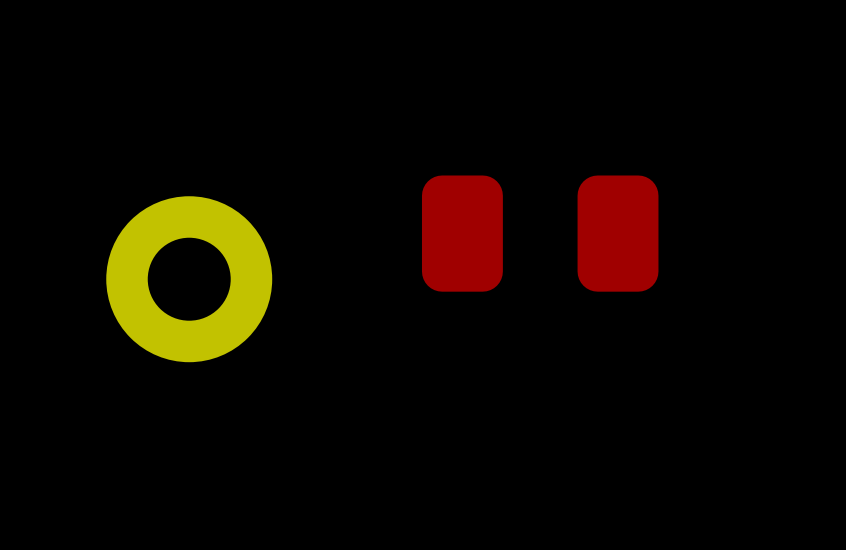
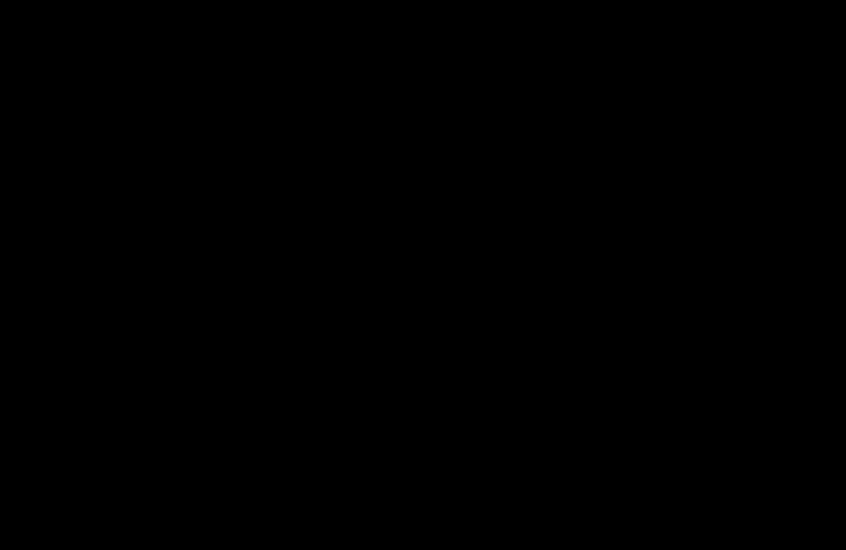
part: (540, 233) -> none
part: (189, 279) -> none

